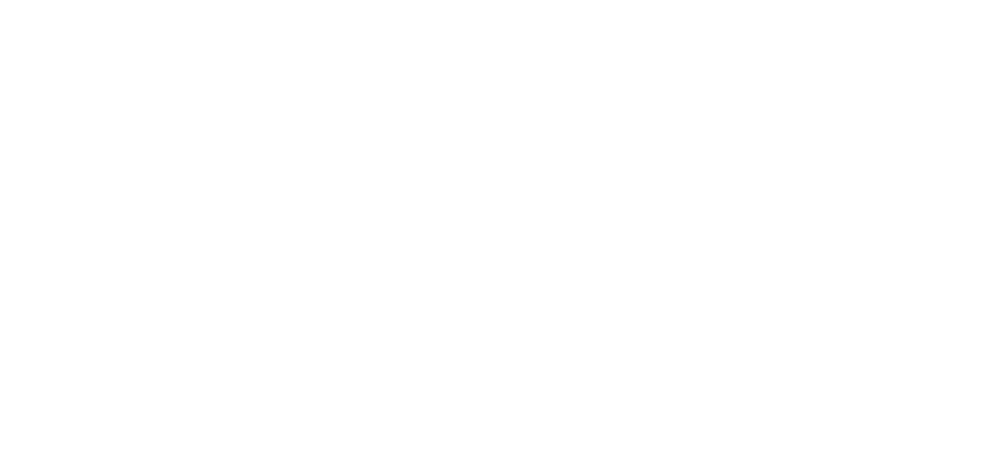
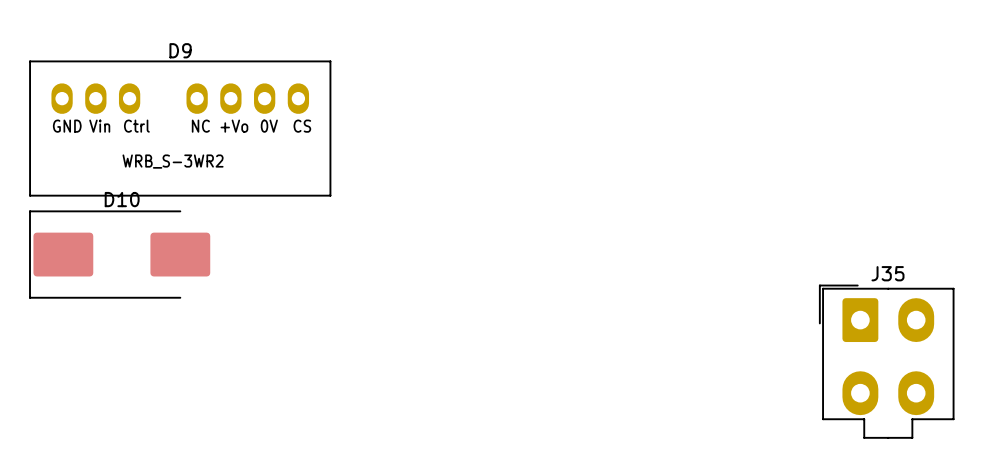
D9: none -> (180, 128)
D10: none -> (119, 254)
J35: none -> (886, 361)

